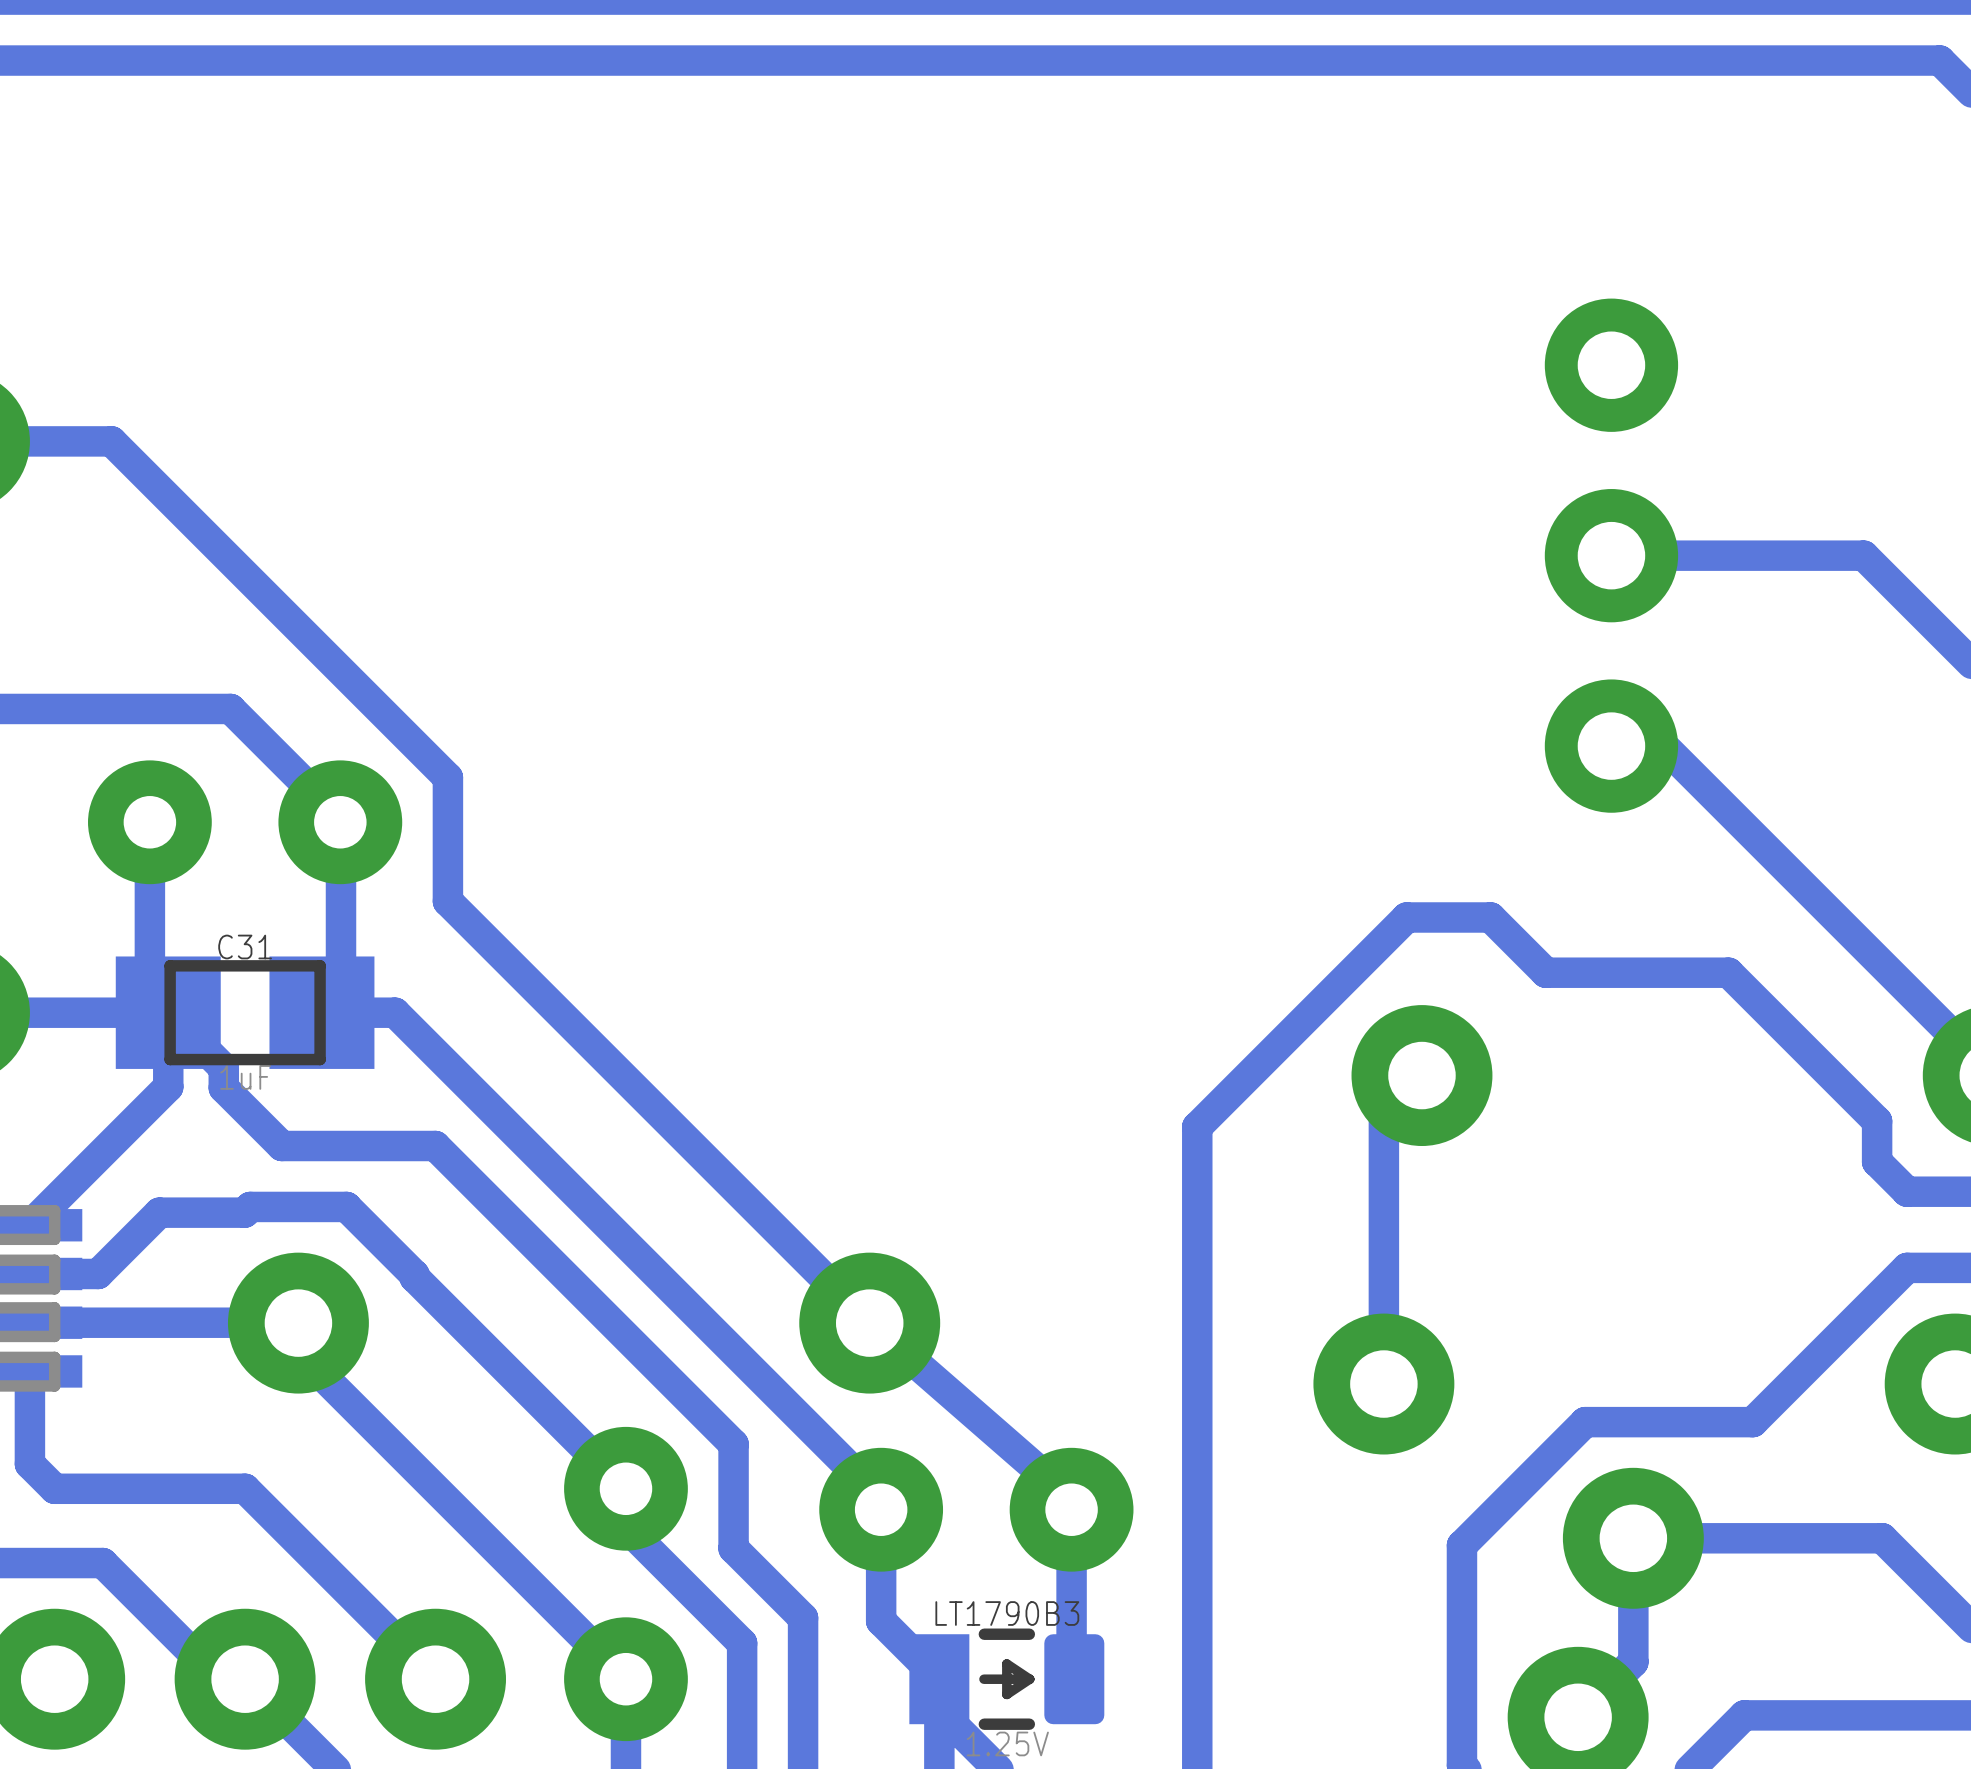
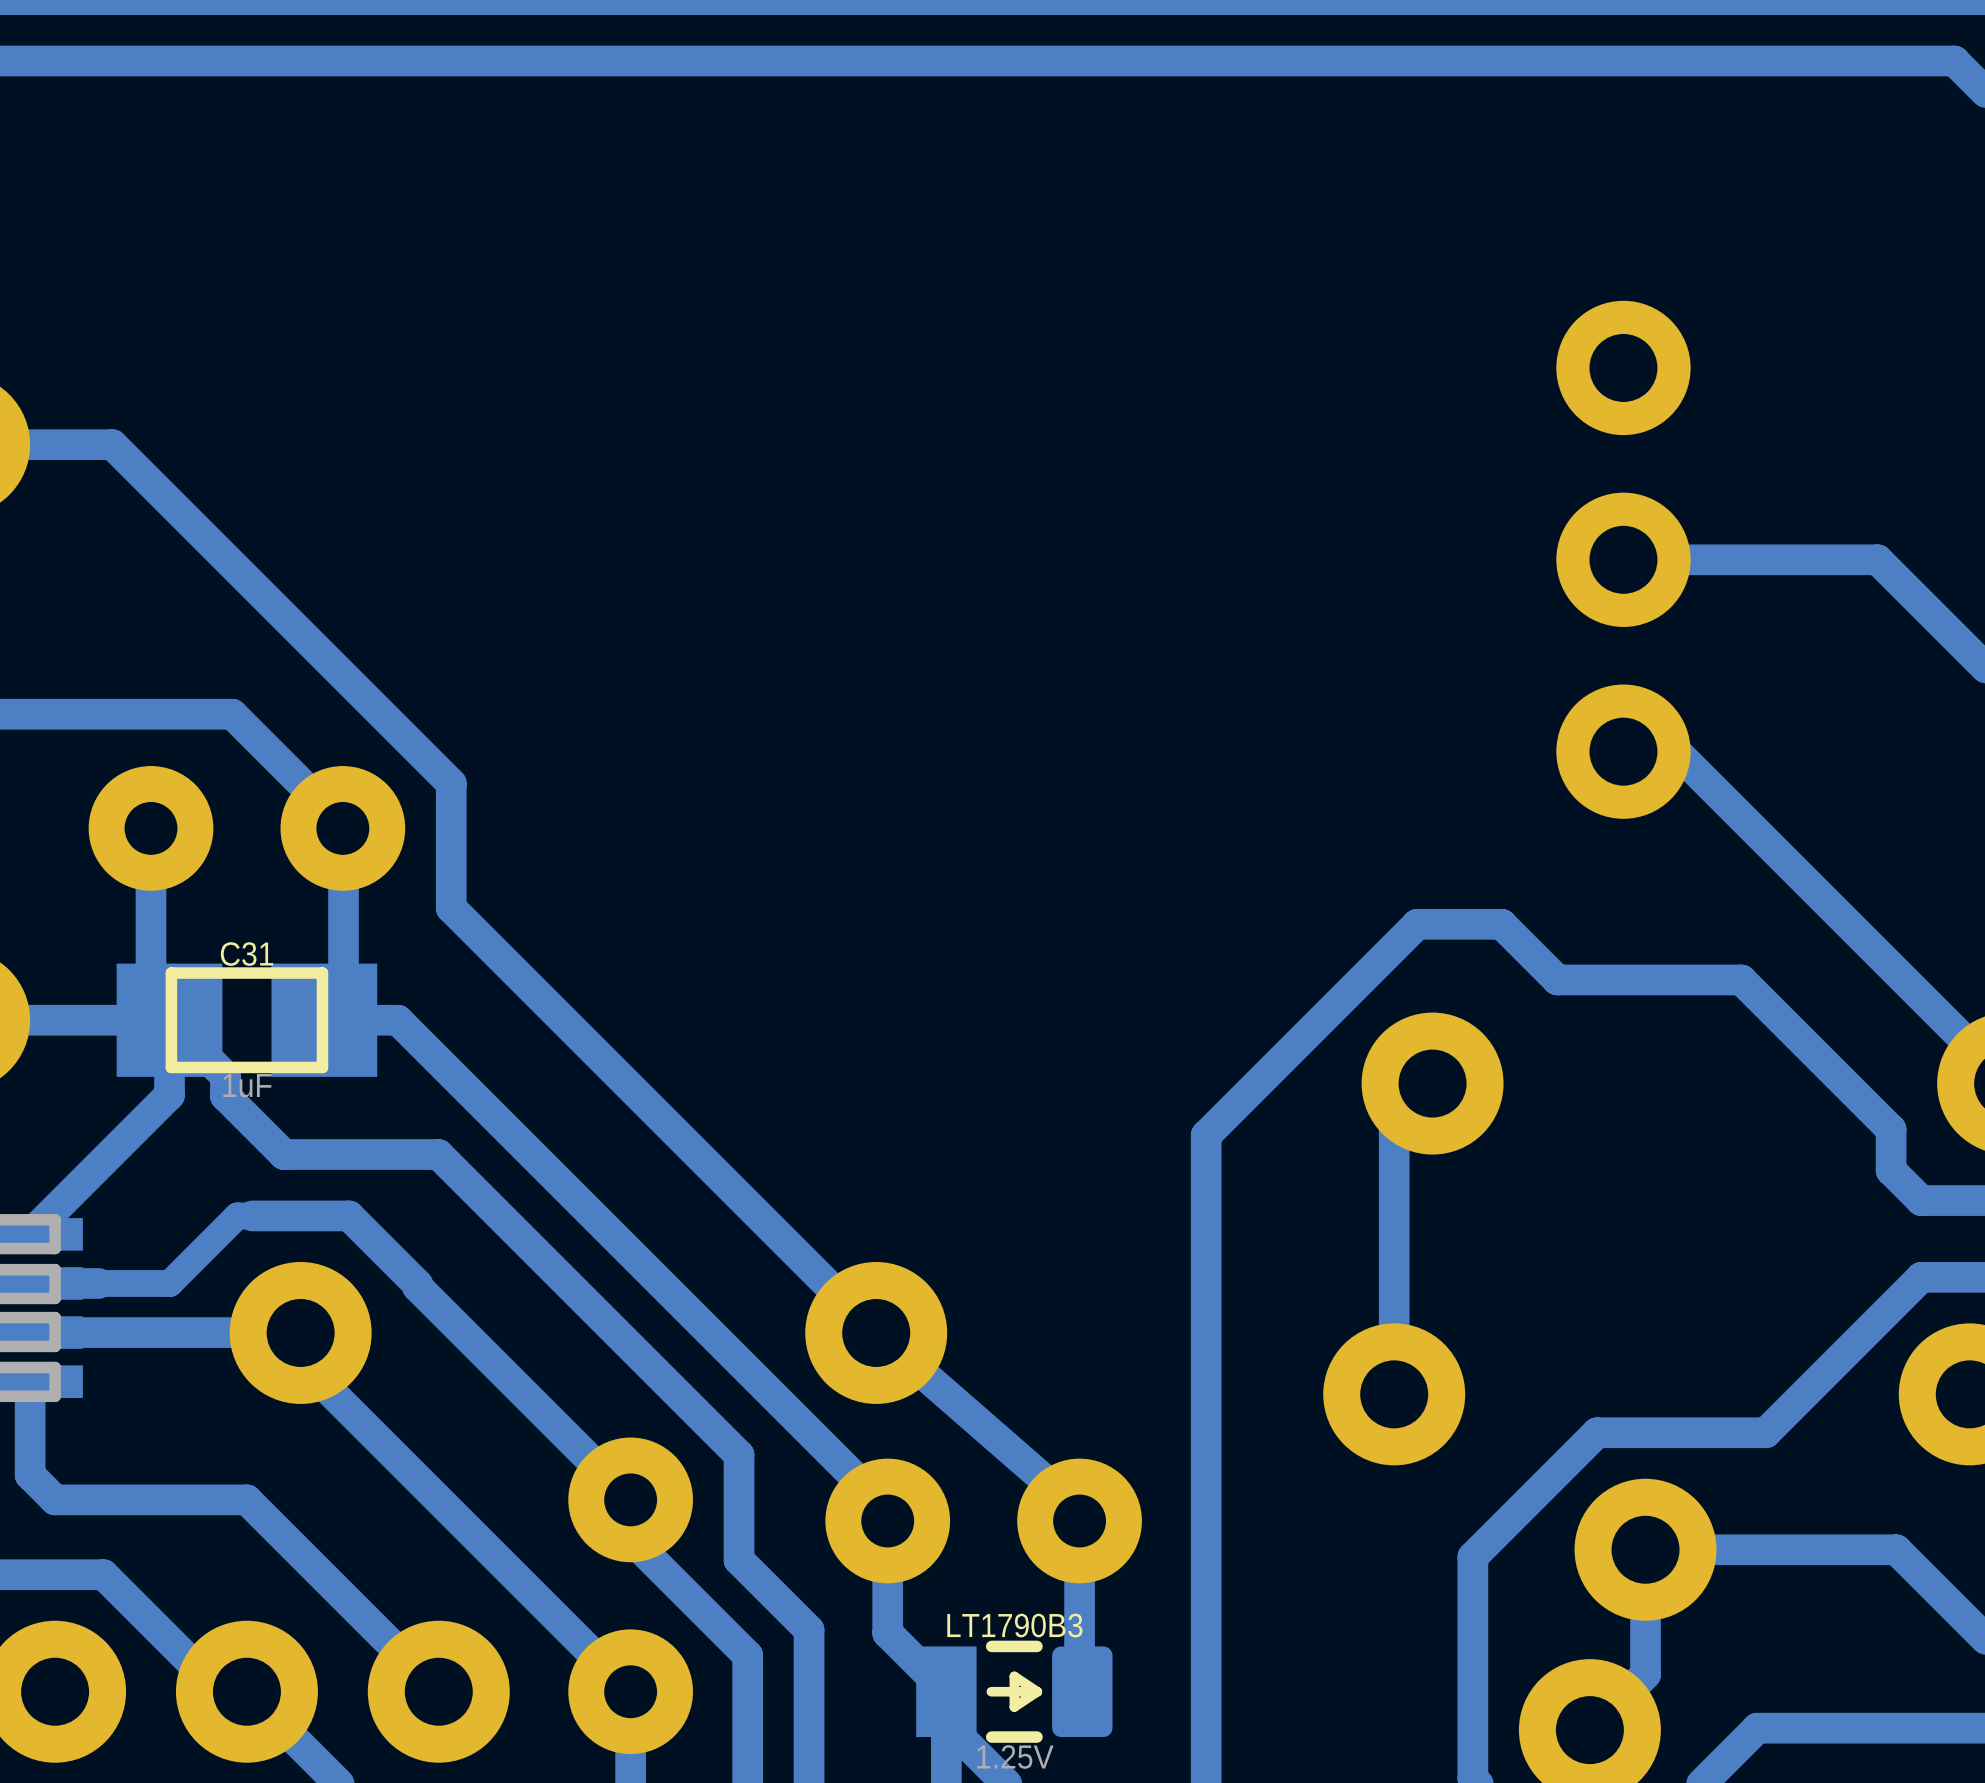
track: (250, 1206) (244, 1212) (159, 1212) (98, 1273) -> (252, 1215) (237, 1215) (169, 1283) (98, 1283)

